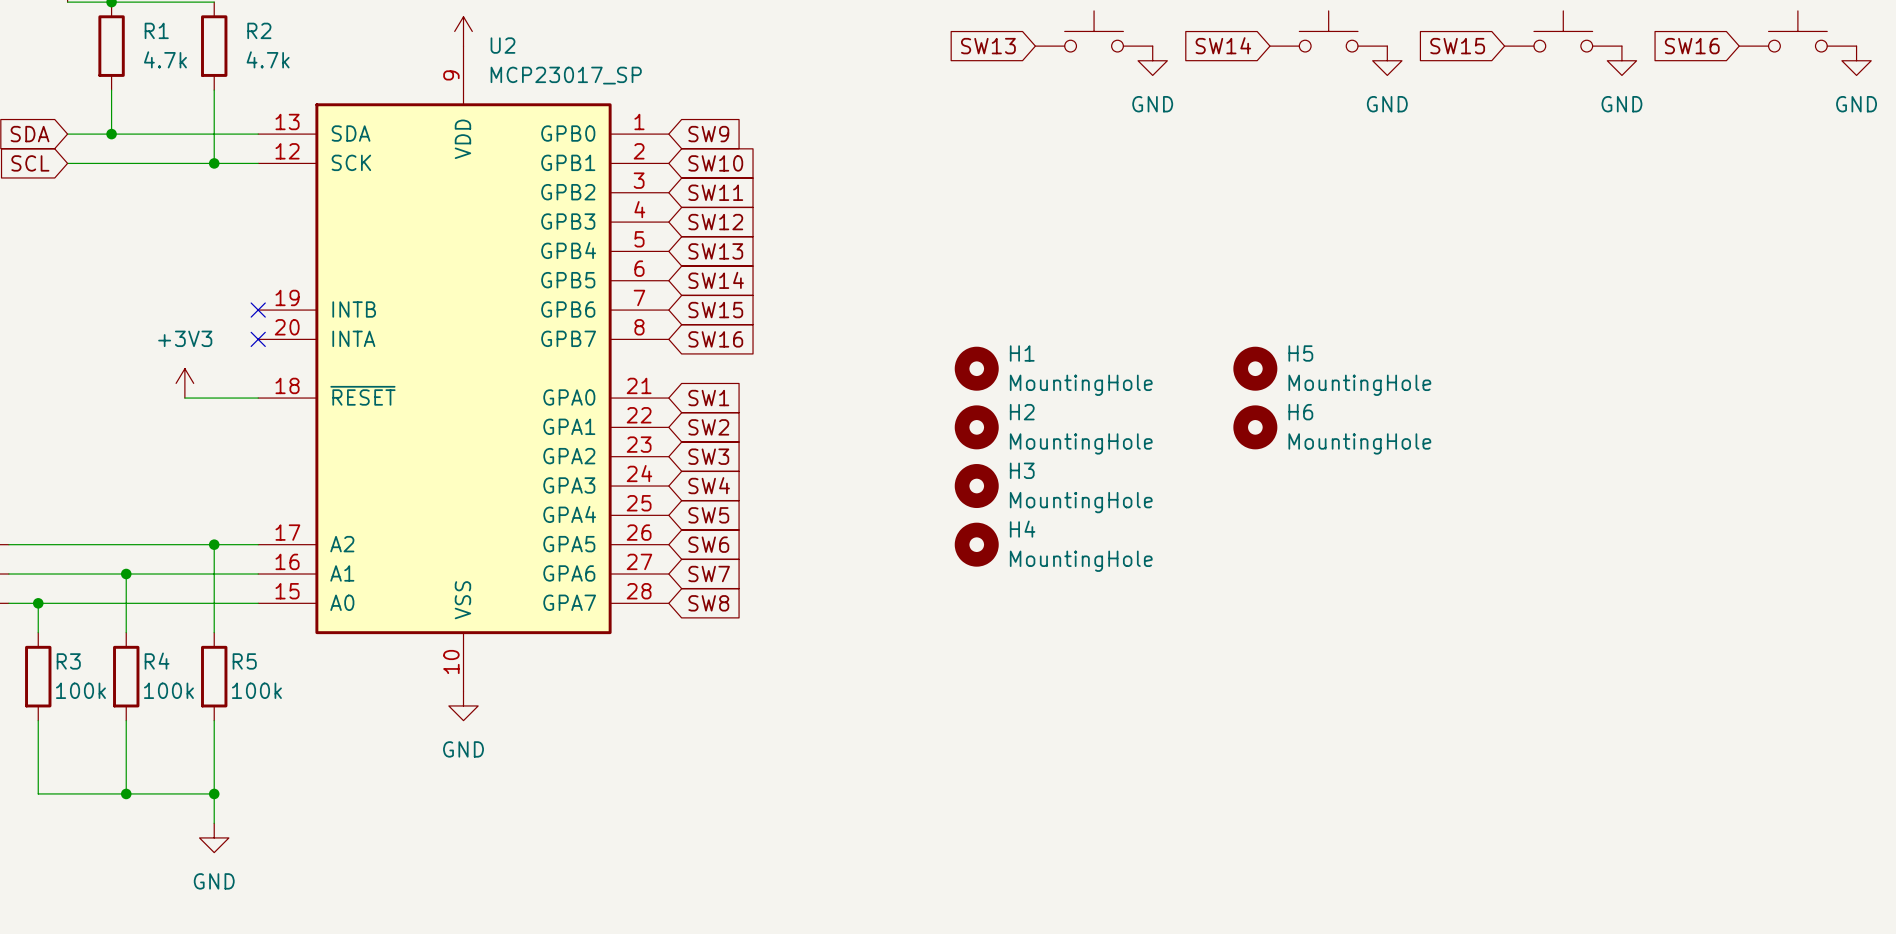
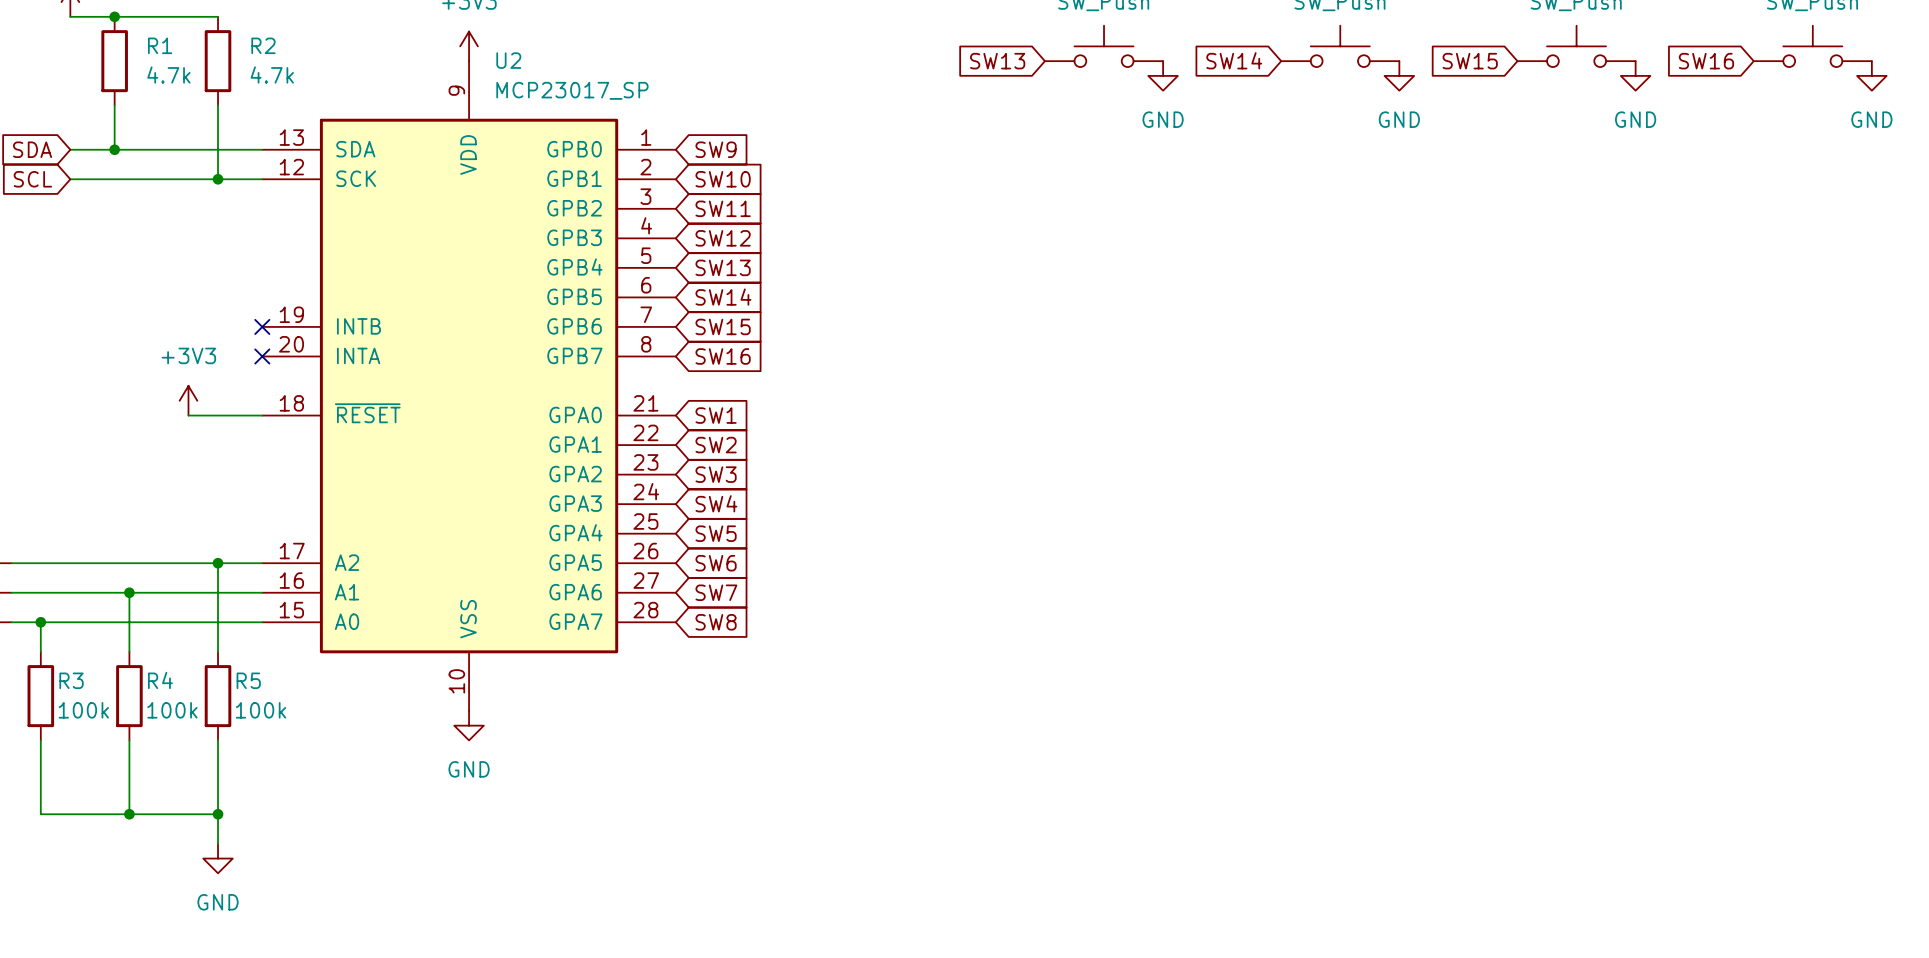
H1: MountingHole (976, 368) -> none
H5: MountingHole (1255, 368) -> none
H2: MountingHole (976, 427) -> none
H6: MountingHole (1255, 427) -> none
H3: MountingHole (976, 486) -> none
H4: MountingHole (976, 544) -> none

